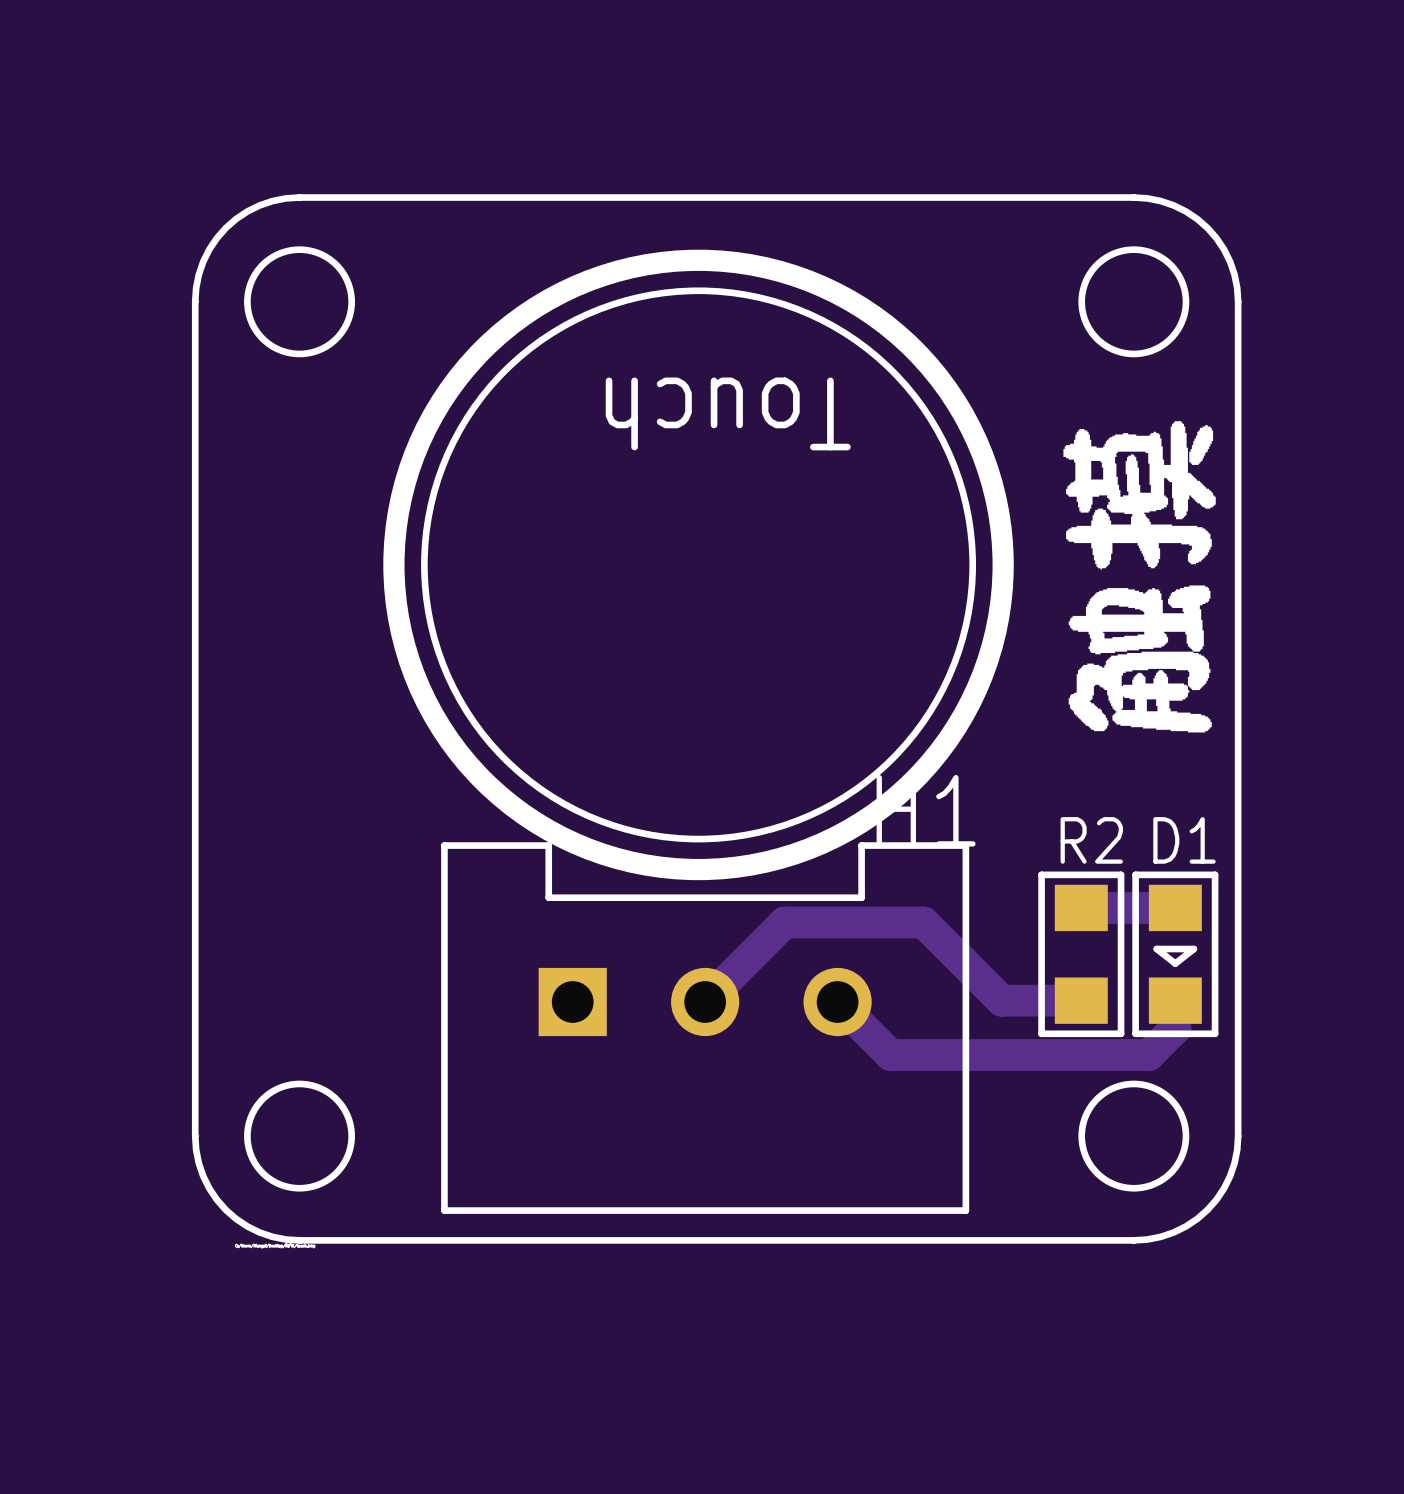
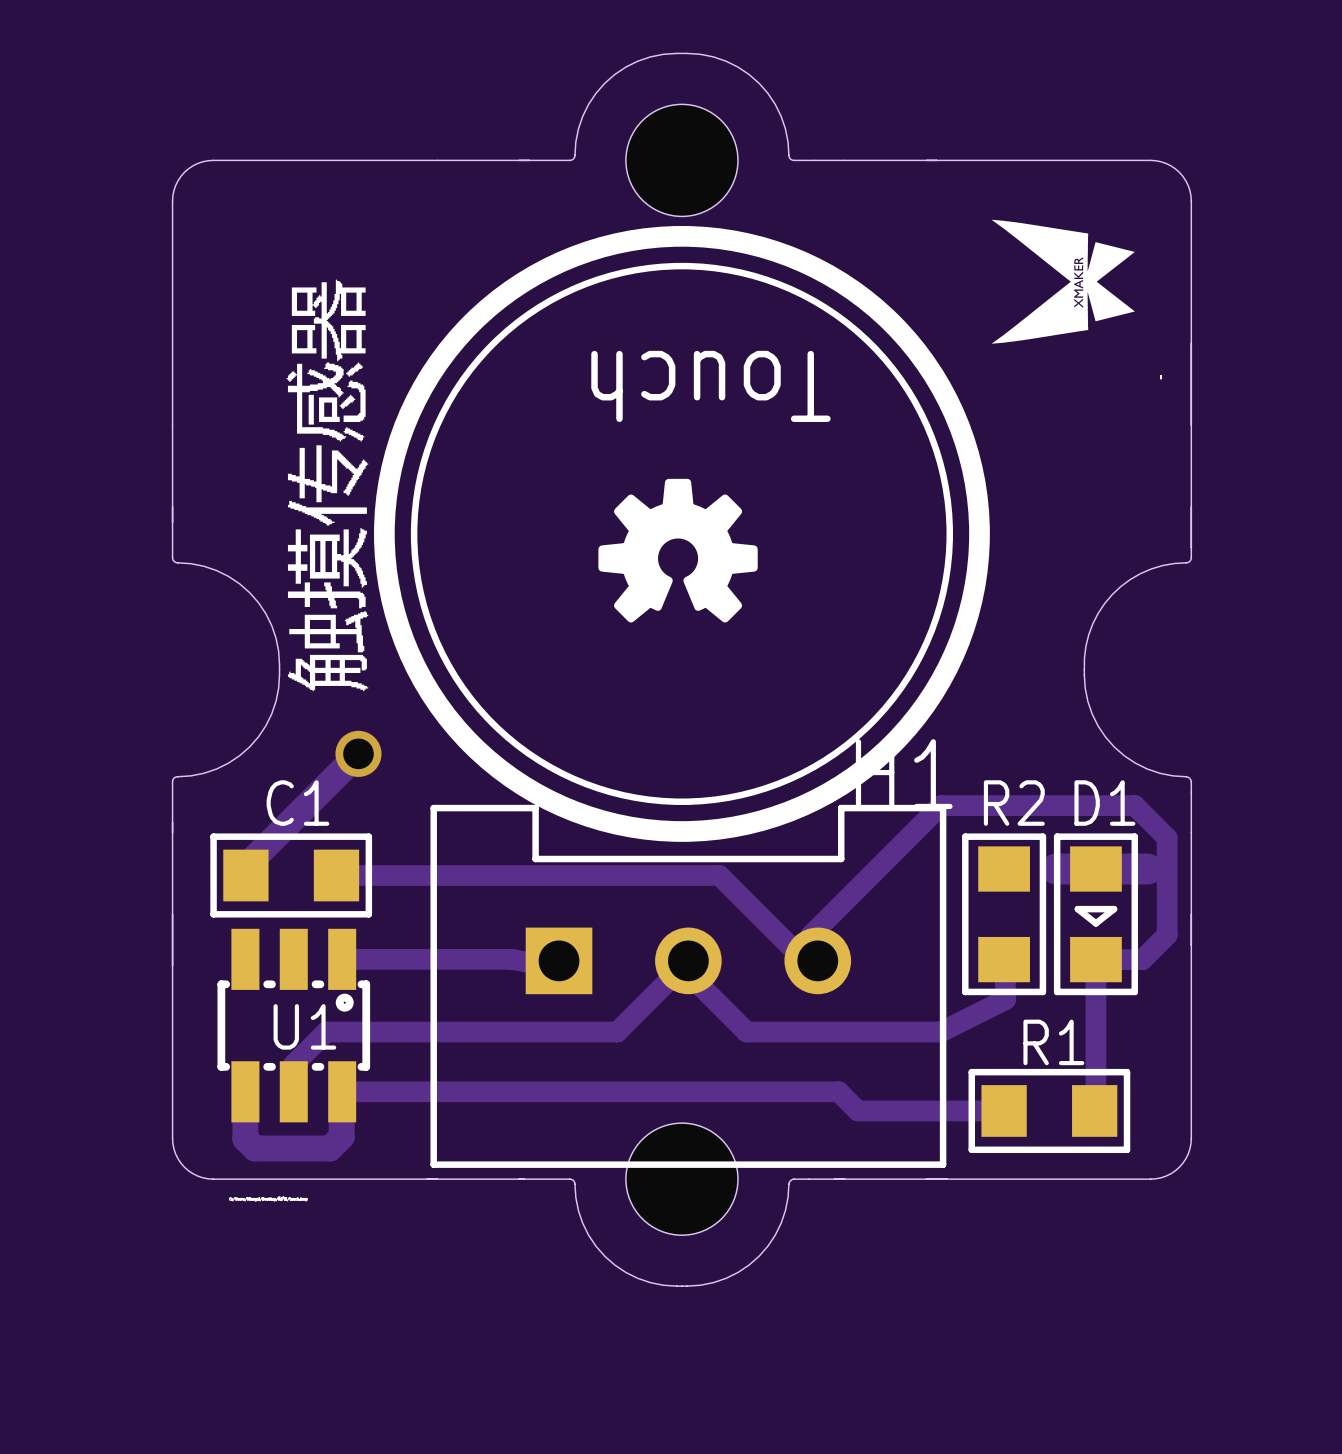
drawing: [191, 194, 1242, 1244] -> none
drawing: none -> [974, 219, 1135, 344]
drawing: none -> [286, 279, 369, 692]
drawing: none -> [598, 478, 758, 623]
part: none -> (681, 669)
track: none -> (358, 753) (245, 866) (245, 875)
via: none -> (358, 753)
C1: none -> (291, 875)
track: none -> (344, 883) (336, 875) (719, 875) (811, 967) (811, 935) (940, 805) (1134, 805) (1167, 837) (1167, 935) (1142, 959) (1095, 959) (1095, 1122)
R2 position: (1081, 954) -> (1004, 914)
D1 position: (1175, 954) -> (1095, 914)
track: none -> (342, 959) (512, 959) (552, 967)
track: none -> (1004, 959) (1005, 999) (940, 1032) (746, 1032) (681, 967) (617, 1032) (326, 1032) (293, 1064) (293, 1091)
track: (1081, 1000) (1001, 1000) (923, 922) (784, 922) (705, 1002) -> none
track: (1175, 1000) (1175, 1028) (1148, 1054) (890, 1054) (837, 1002) -> none
U1: none -> (293, 1025)
track: none -> (245, 1091) (245, 1138) (254, 1148) (330, 1148) (341, 1136) (341, 1092)
track: none -> (342, 1091) (838, 1091) (857, 1110) (1004, 1110)
R1: none -> (1049, 1110)

